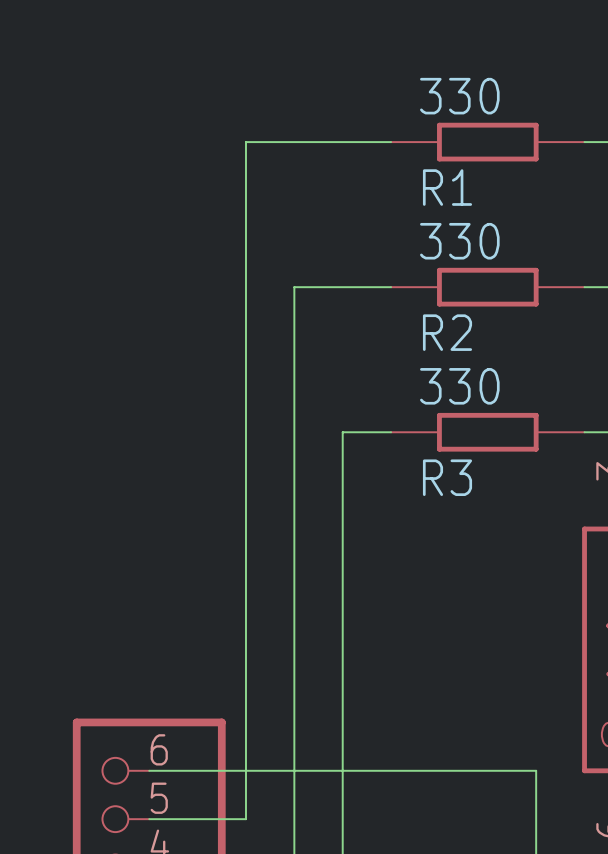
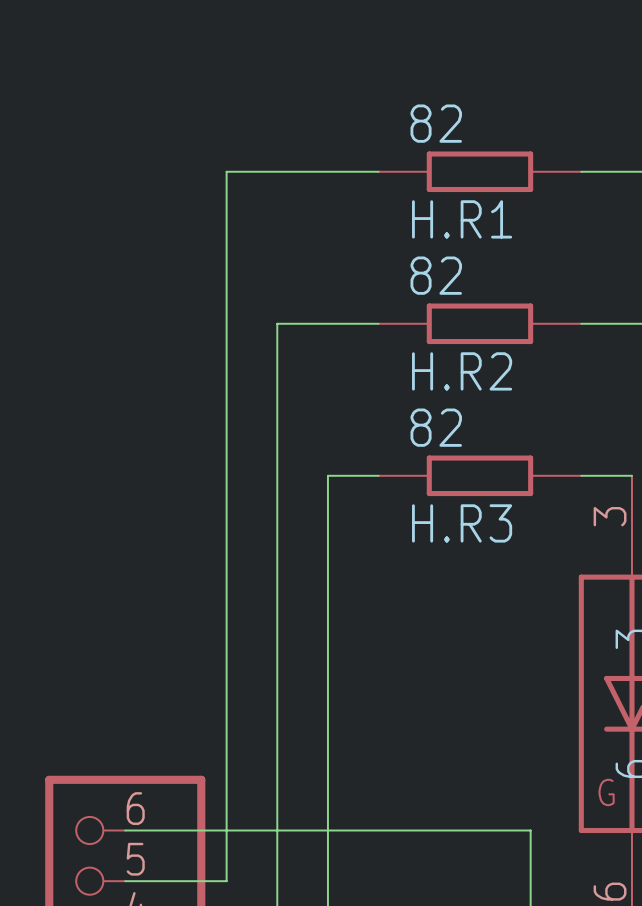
R1 value: 330 (459, 96) -> 82 (436, 123)
R1 name: R1 (447, 187) -> H.R1 (462, 219)
R2 value: 330 (459, 241) -> 82 (436, 275)
R2 name: R2 (447, 332) -> H.R2 (462, 371)
R3 value: 330 (459, 386) -> 82 (436, 427)
R3 name: R3 (447, 477) -> H.R3 (462, 523)

